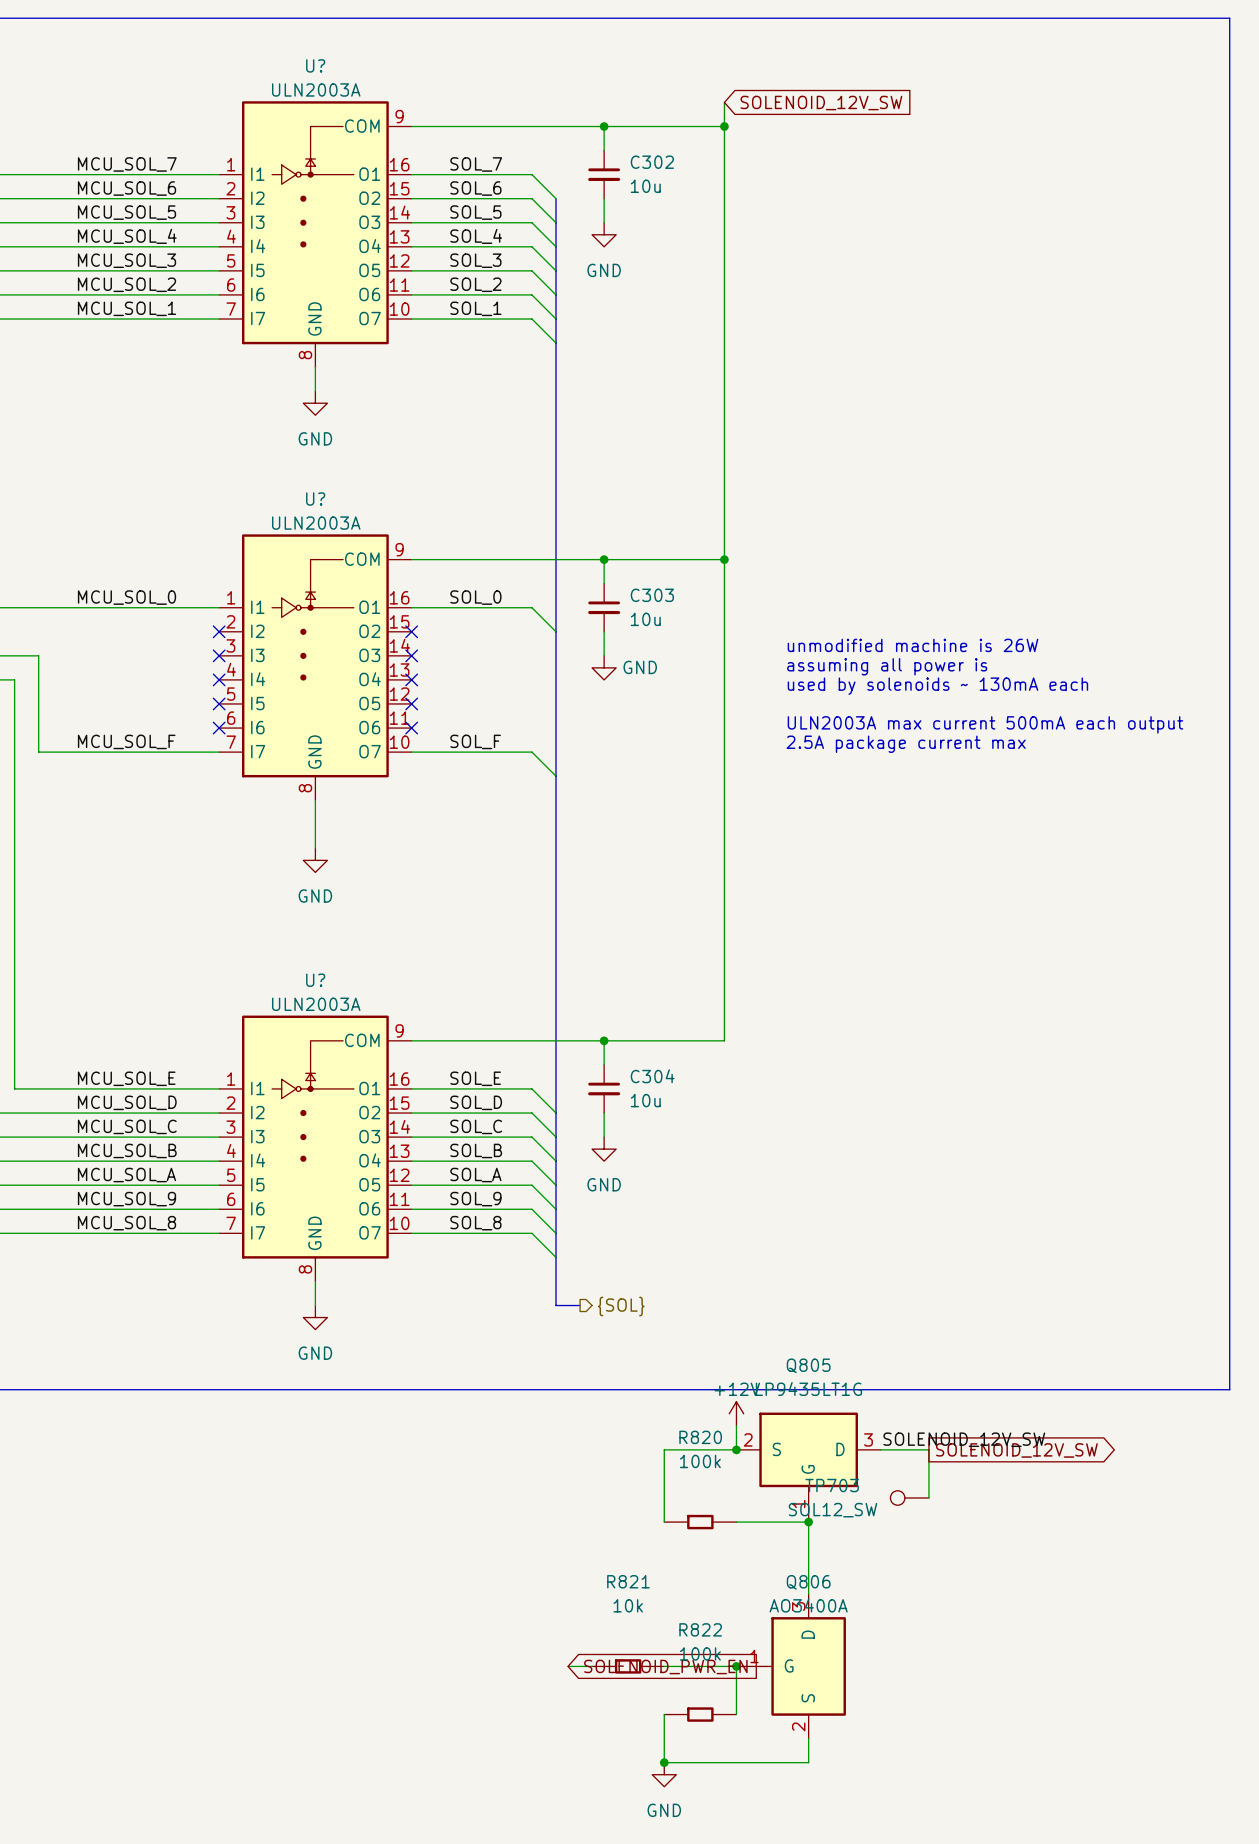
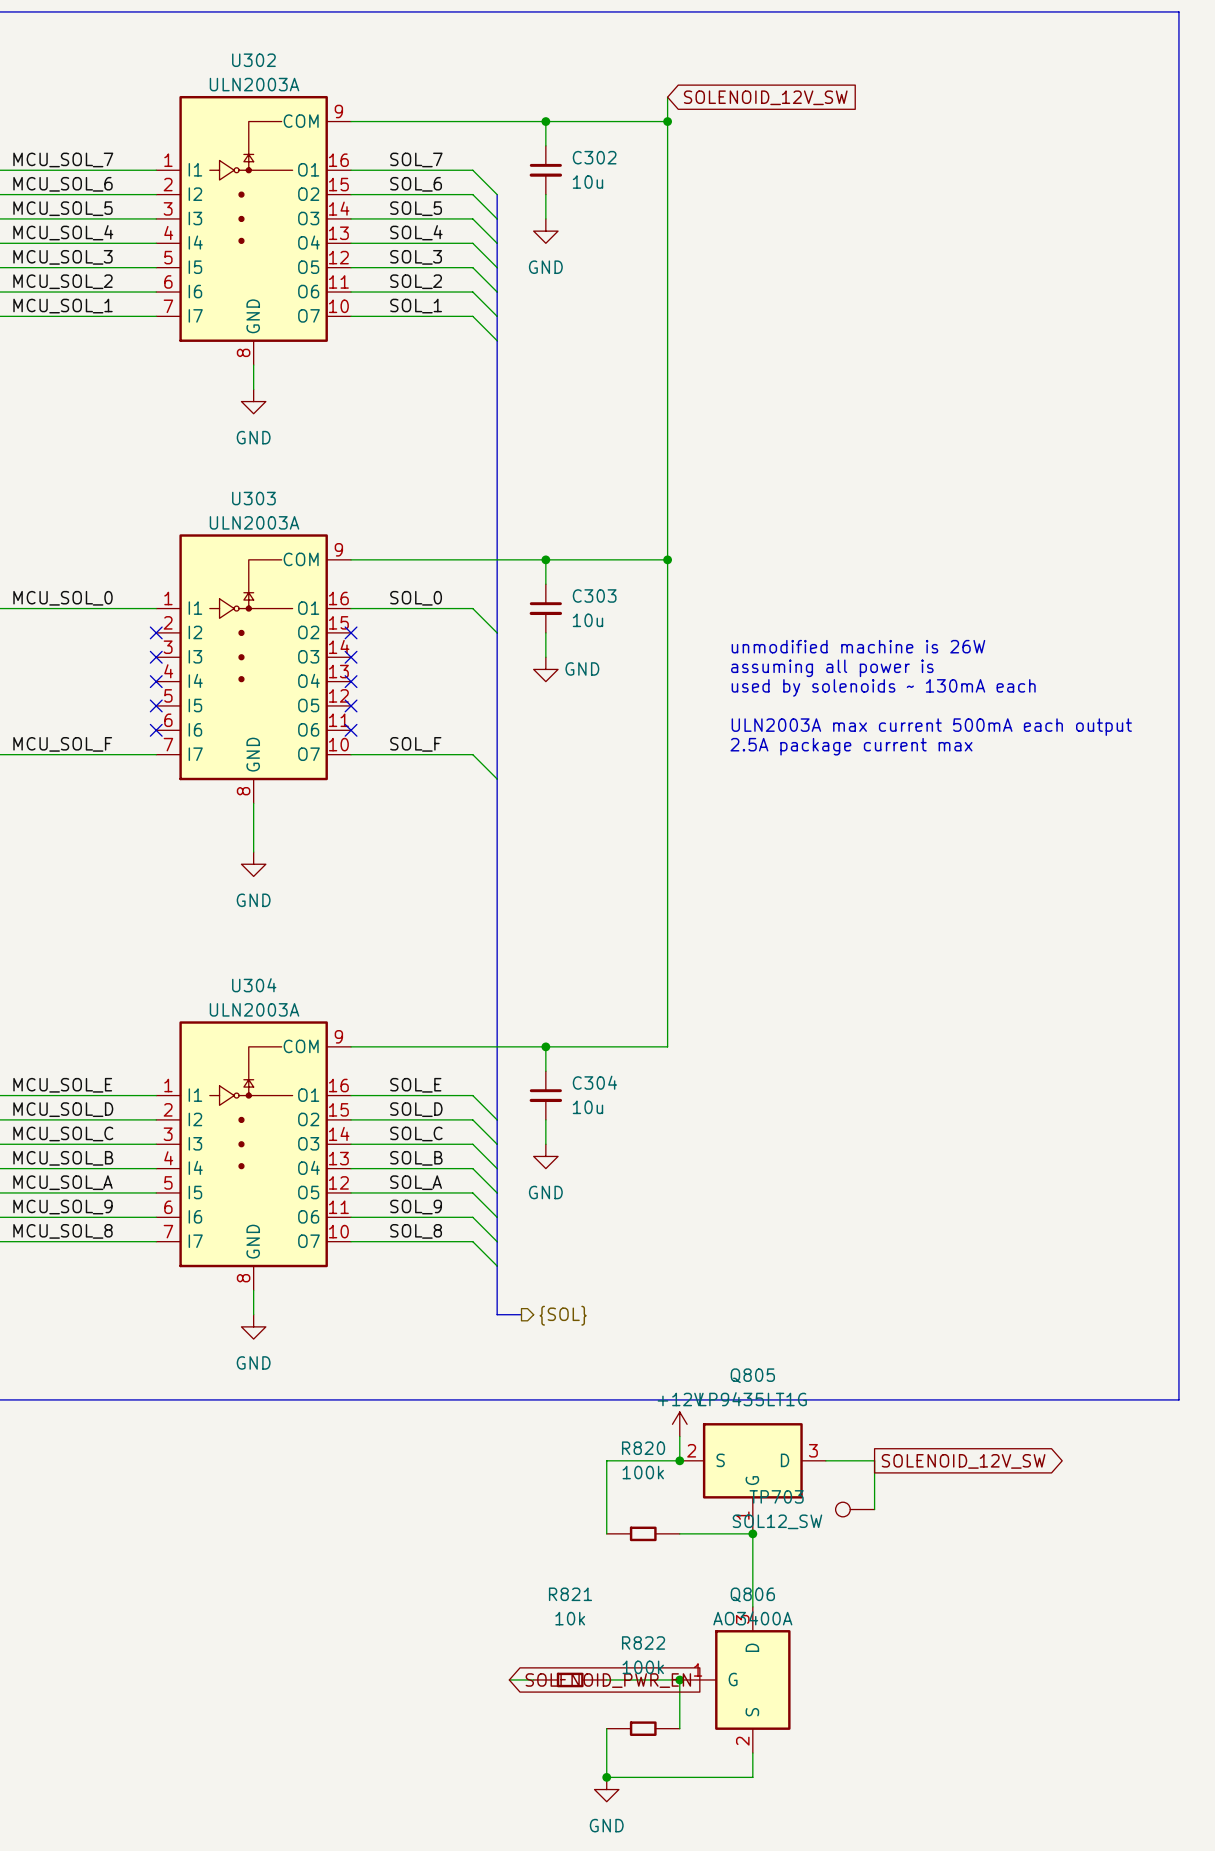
U? name: U? (315, 65) -> U302 (253, 60)
U? name: U? (315, 499) -> U303 (253, 498)
U? name: U? (315, 980) -> U304 (254, 985)
label: SOLENOID_12V_SW (964, 1439) -> none

